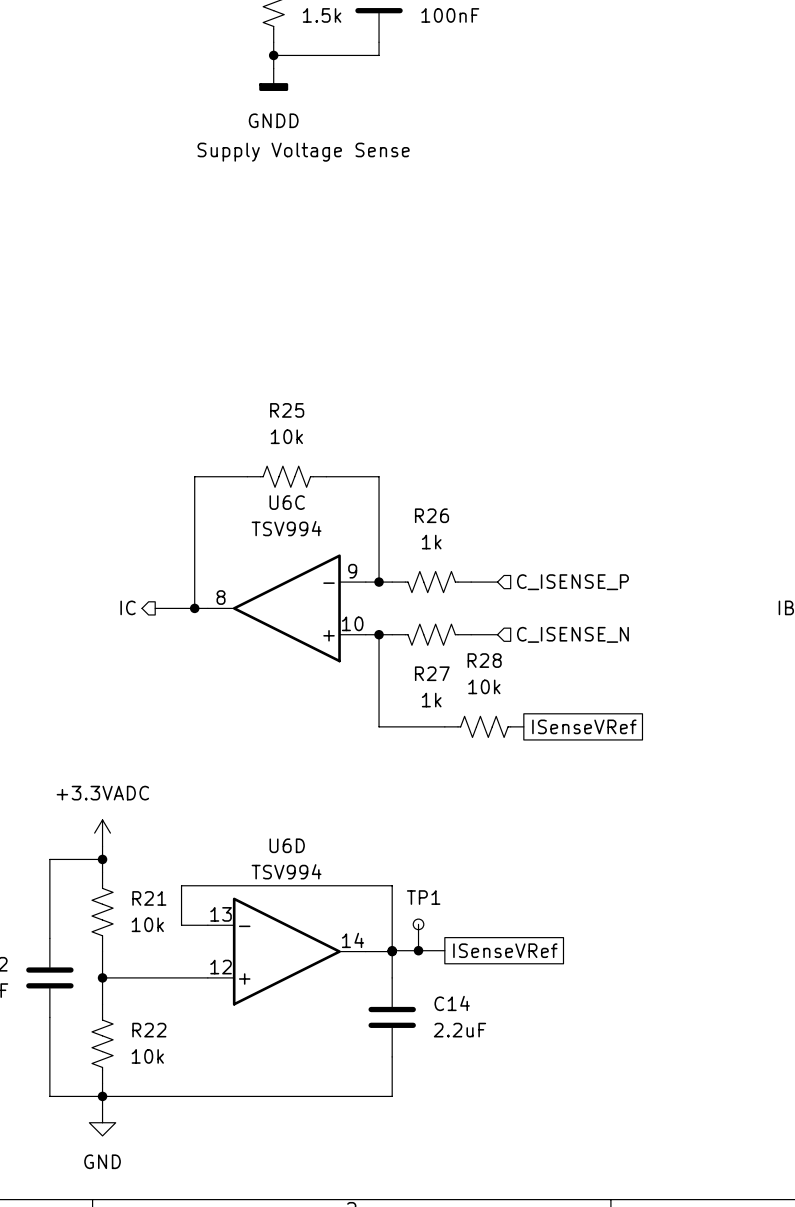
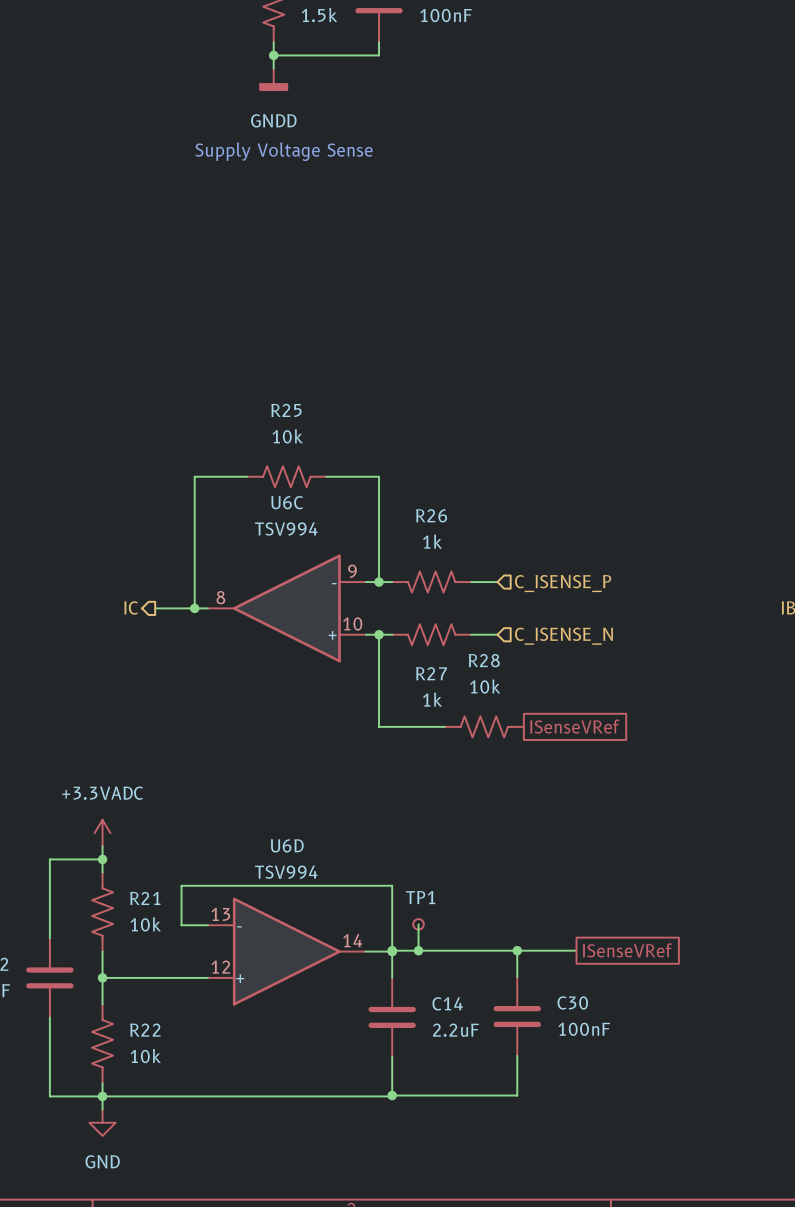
wire: none -> (444, 950) (576, 950)
global label position: ISenseVRef (505, 950) -> ISenseVRef (627, 950)
wire: none -> (517, 950) (517, 977)
junction: none -> (517, 950)
C30: none -> 100nF (517, 1016)
wire: none -> (517, 1056) (517, 1095) (392, 1095)
junction: none -> (392, 1095)

